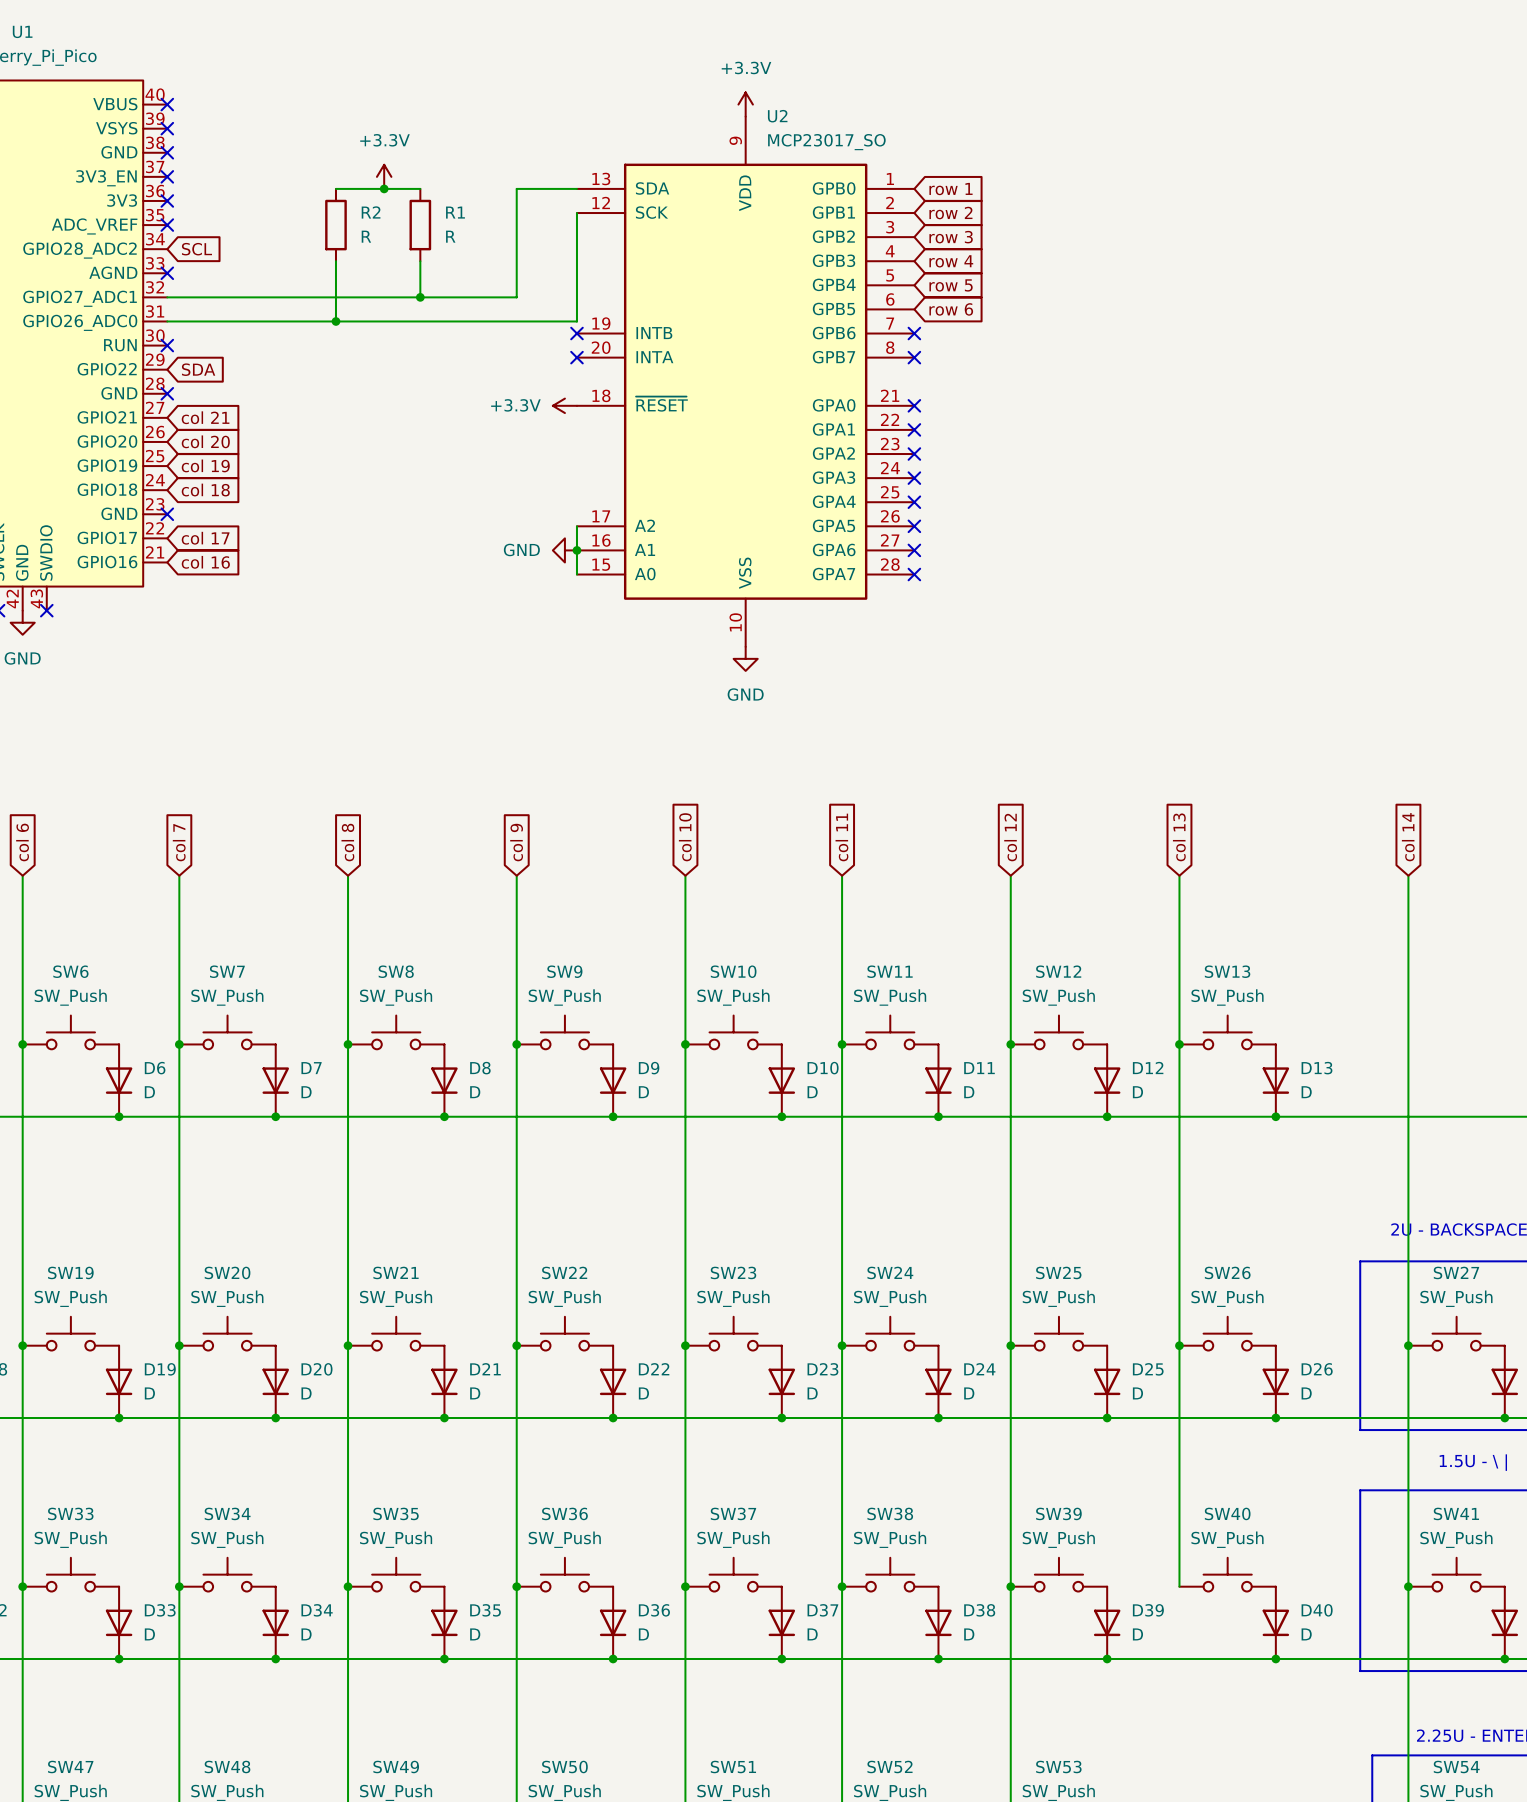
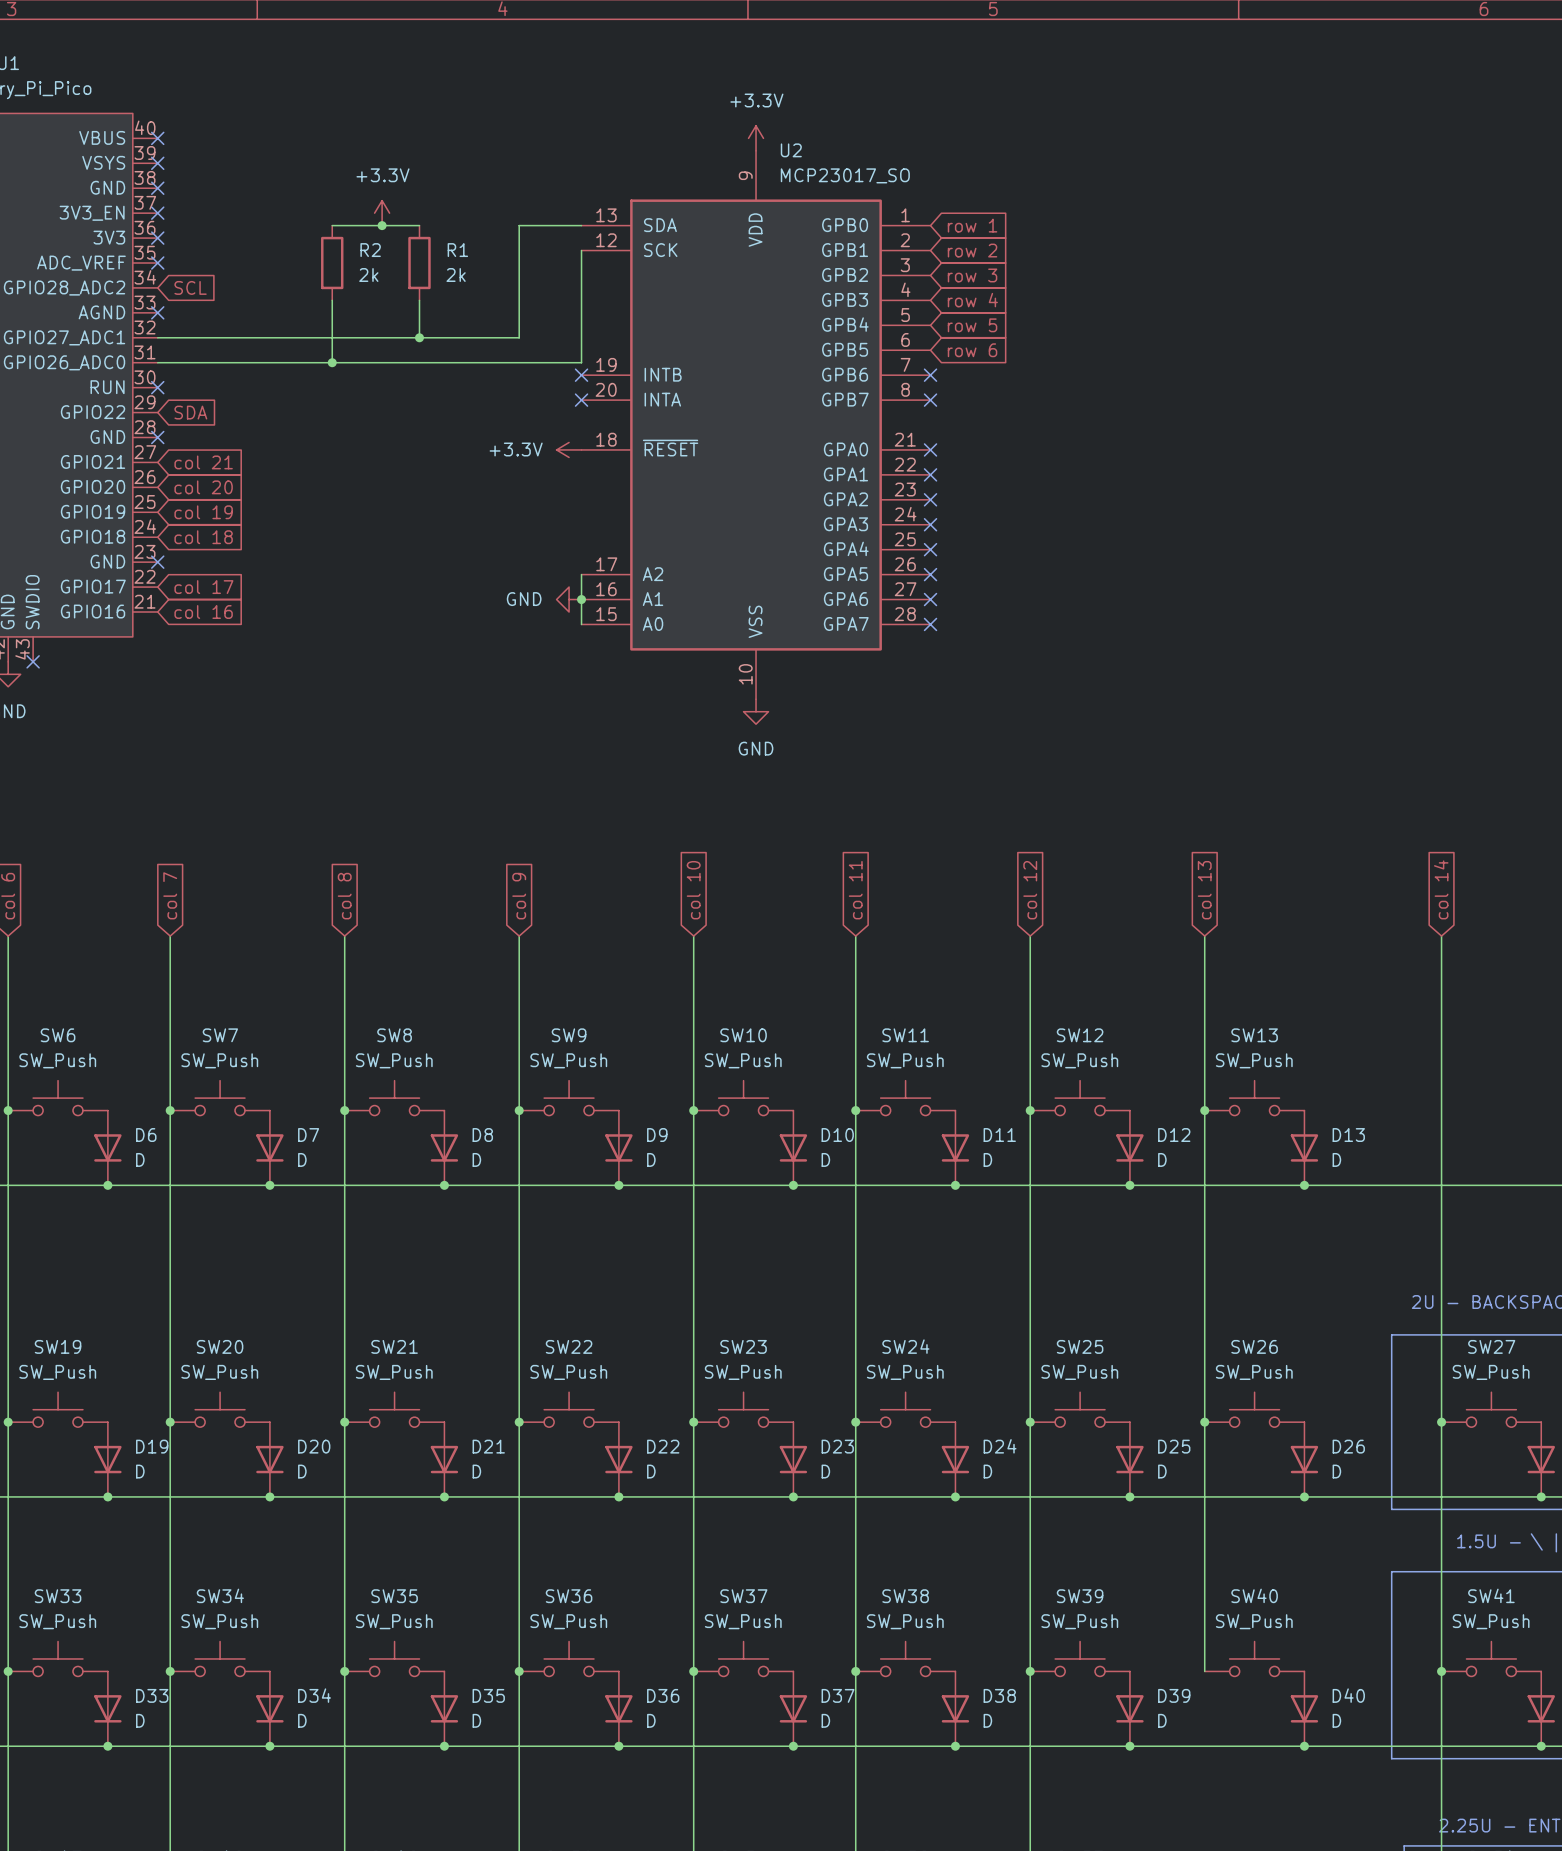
R2 value: R (366, 236) -> 2k (368, 275)
R1 value: R (450, 236) -> 2k (456, 275)

